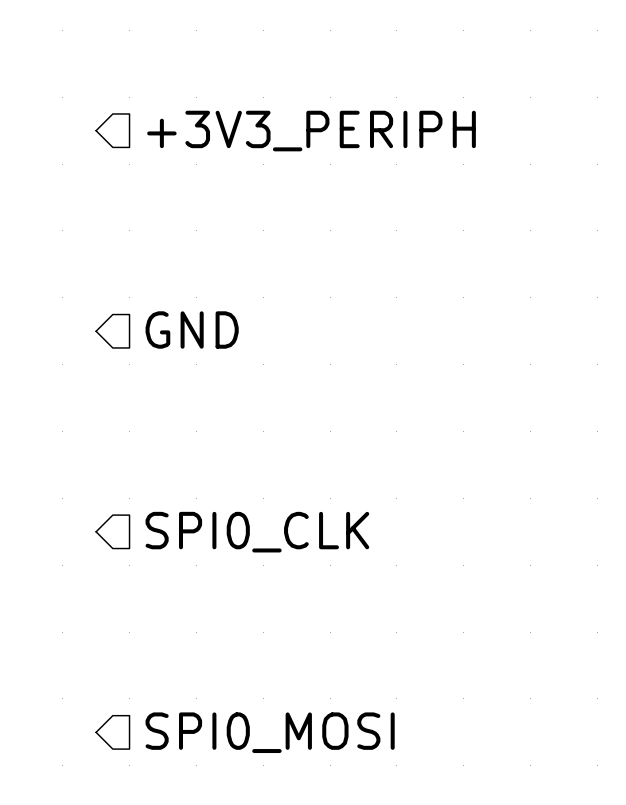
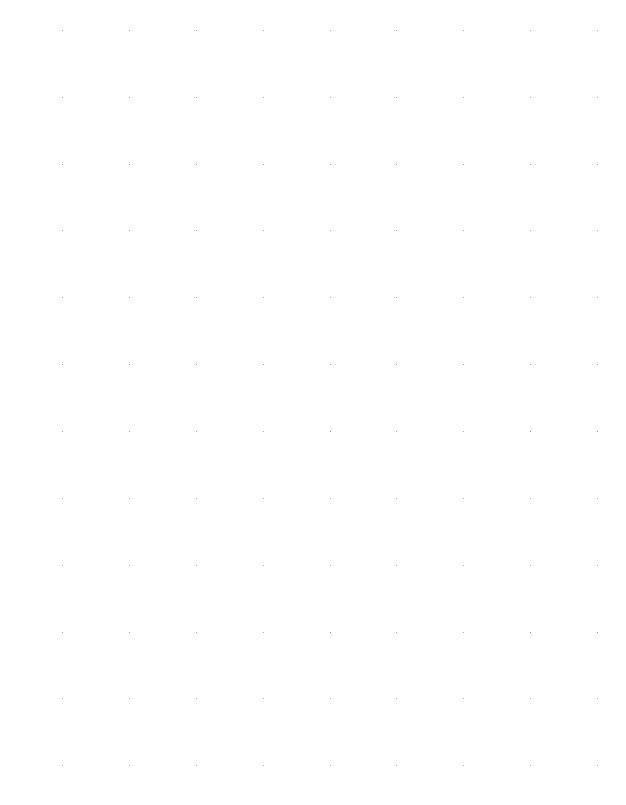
hierarchical label: +3V3_PERIPH (311, 131) -> none
hierarchical label: GND (192, 330) -> none
hierarchical label: SPI0_CLK (257, 532) -> none
hierarchical label: SPI0_MOSI (270, 732) -> none

